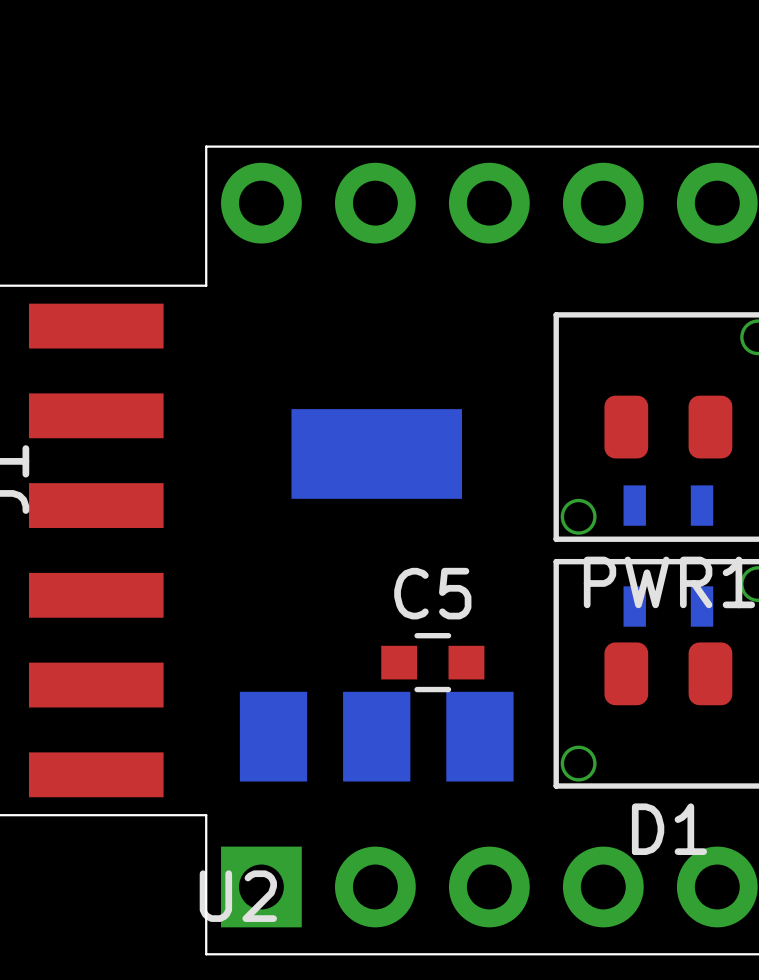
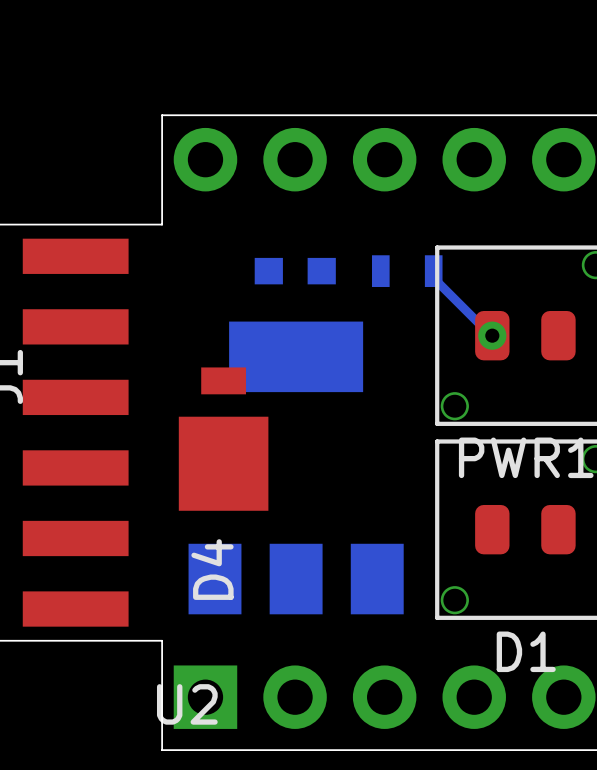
part: none -> (407, 271)
bottom track: none -> (433, 271) (433, 278) (491, 335)
via: none -> (492, 335)
part: (668, 505) -> none
D4: none -> (223, 439)
part: (668, 606) -> none
C5 side: top (432, 662) -> bottom (295, 271)

